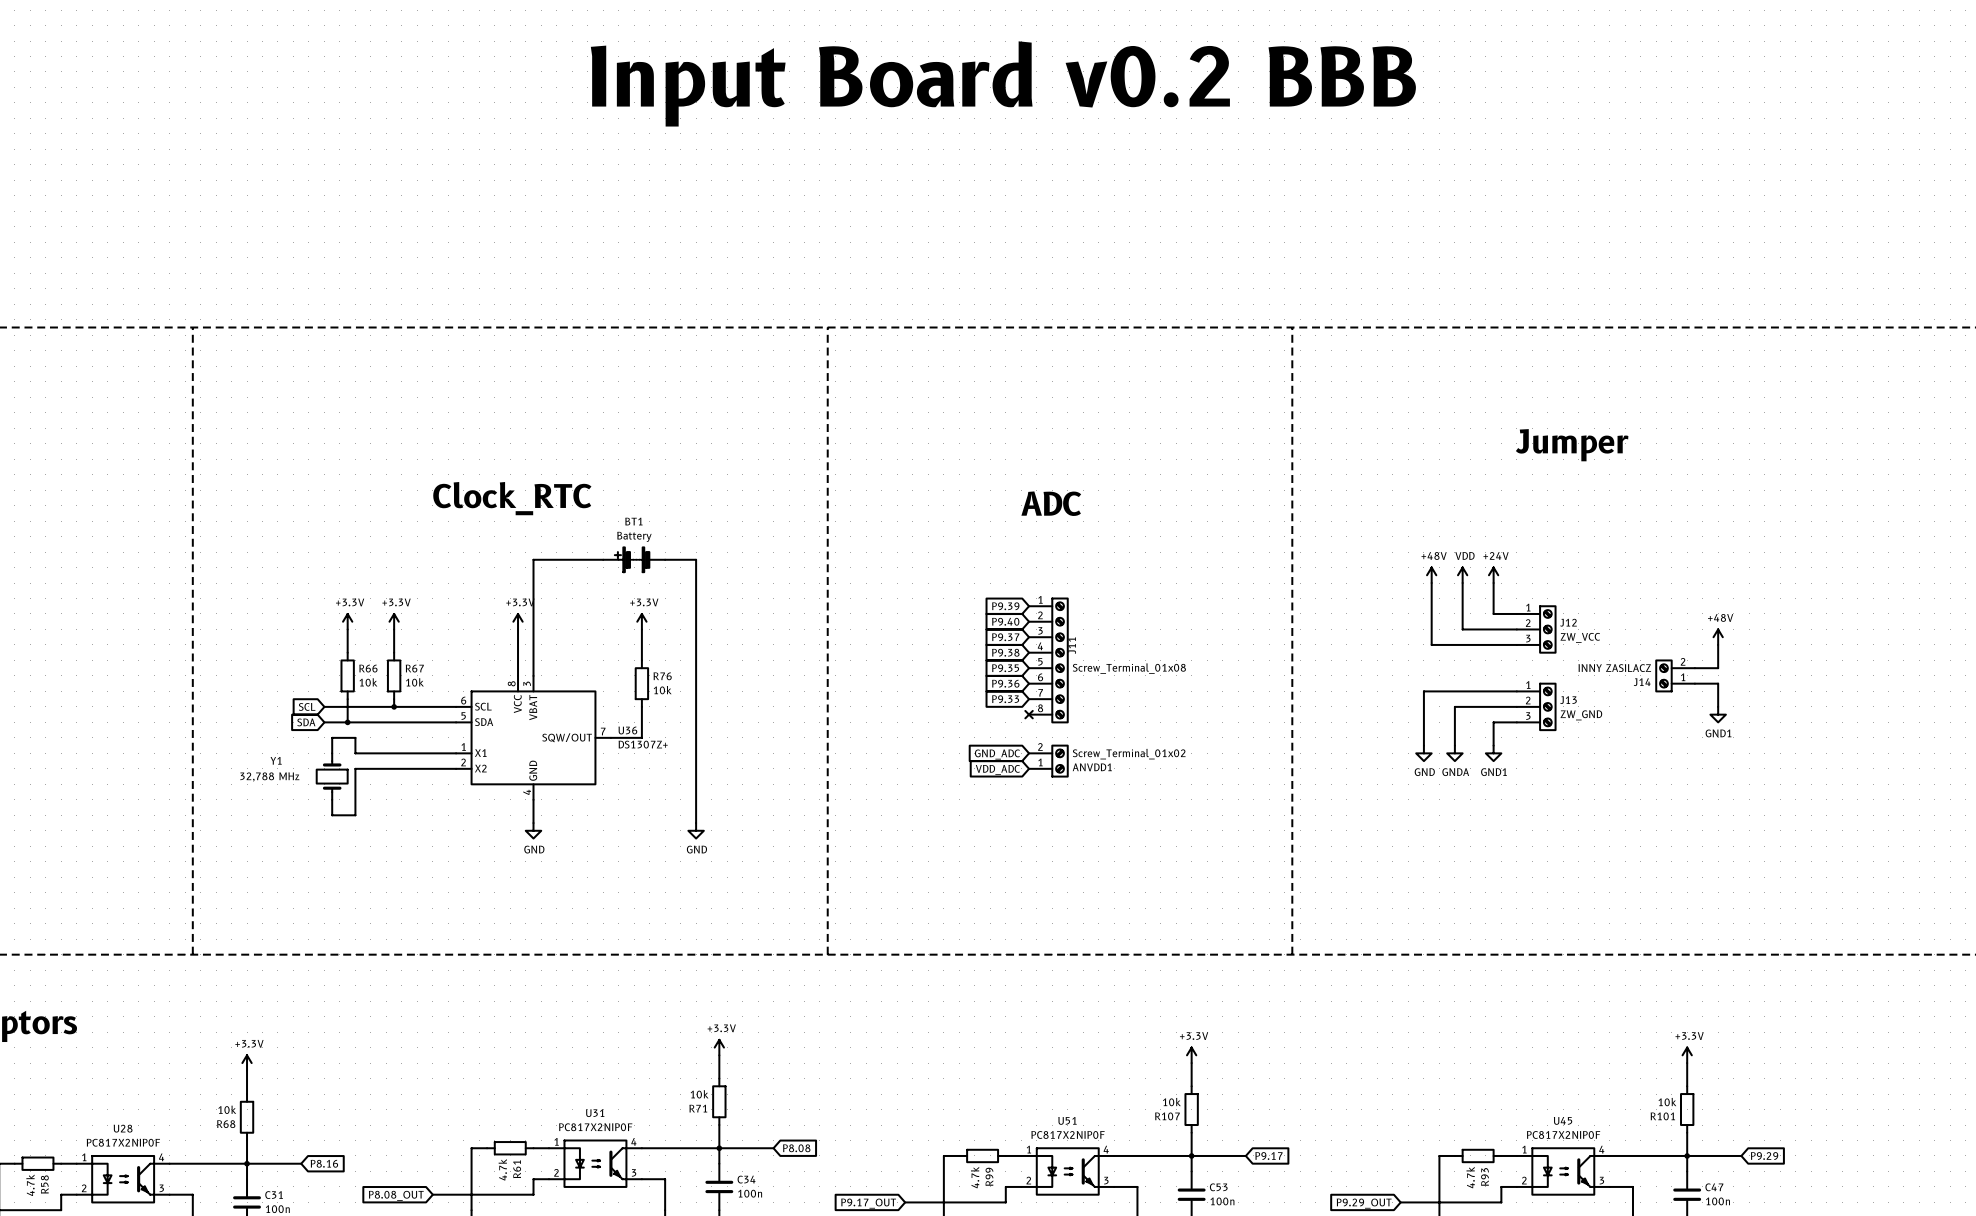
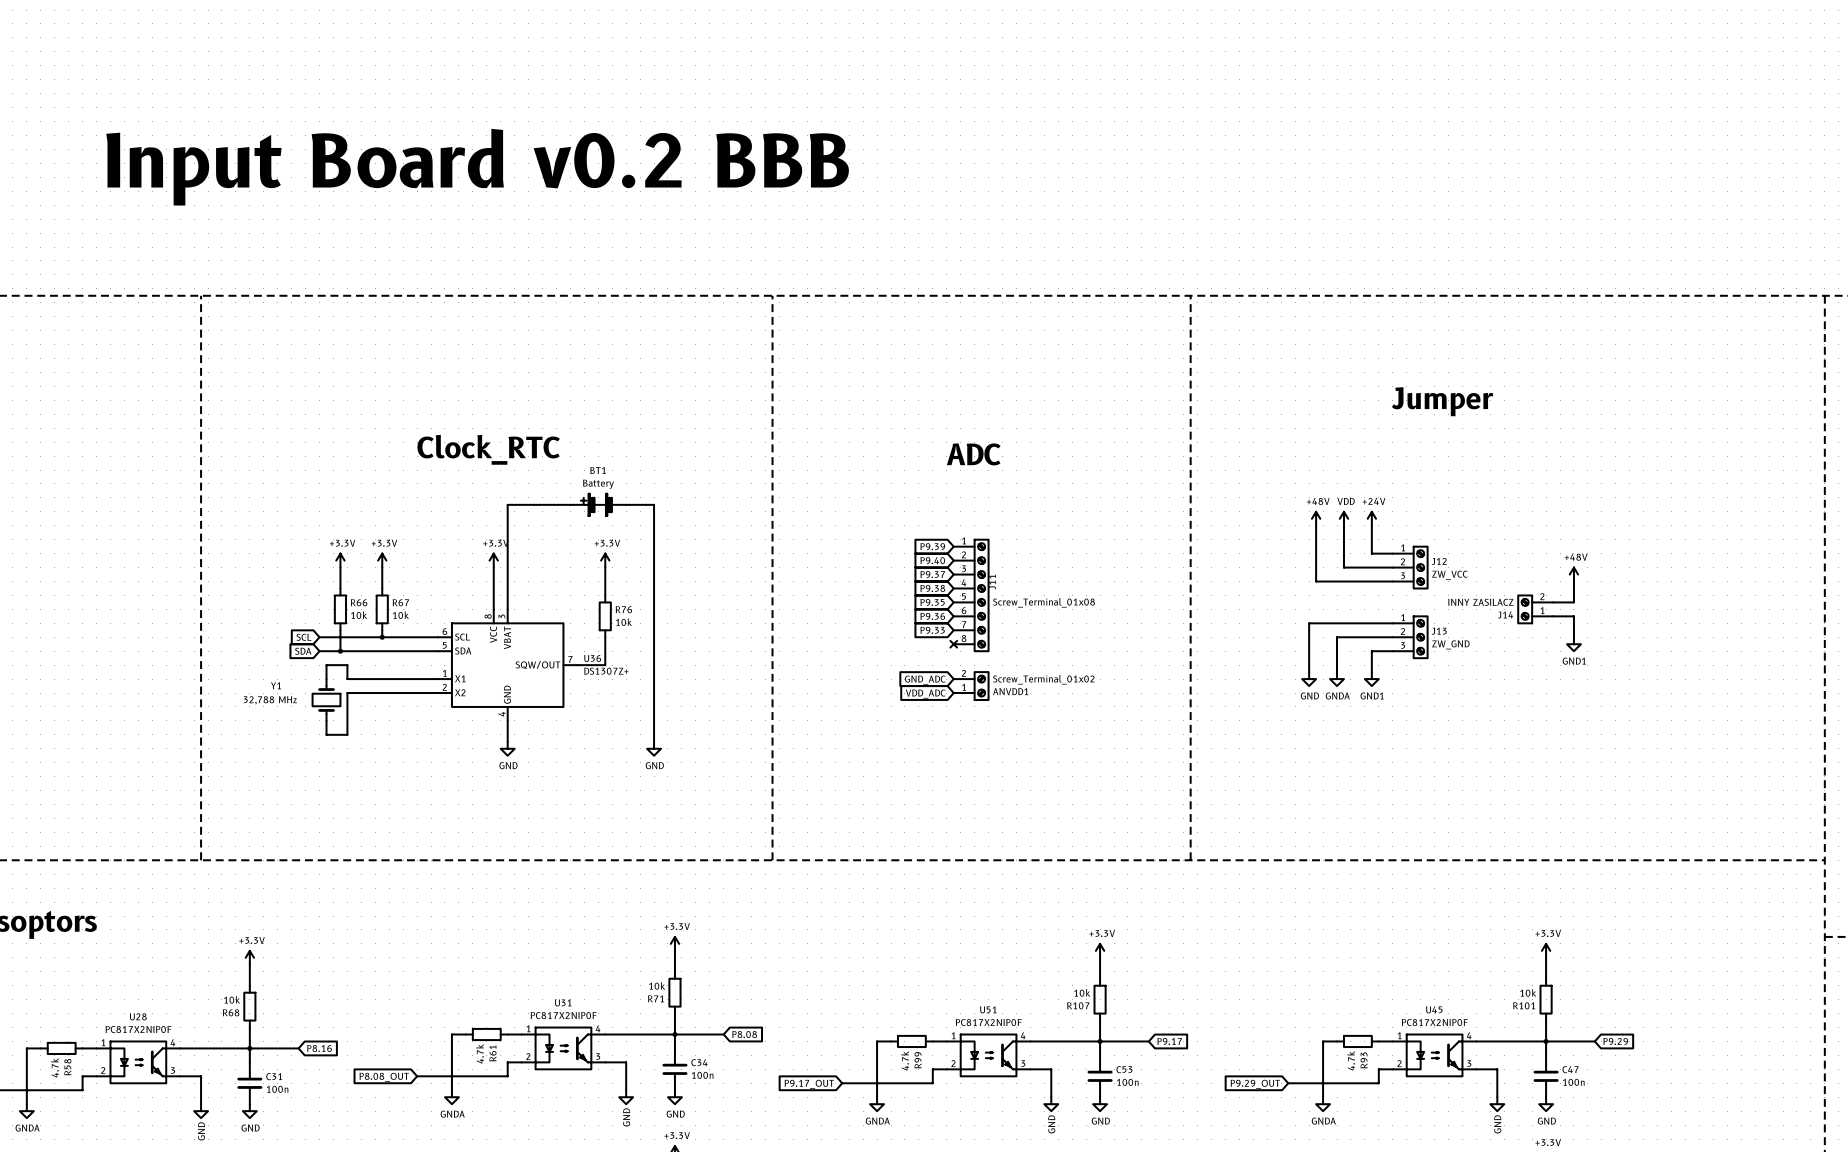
text: Input Board v0.2 BBB (1003, 83) -> none
text: none -> Input Board v0.2 BBB (477, 167)

